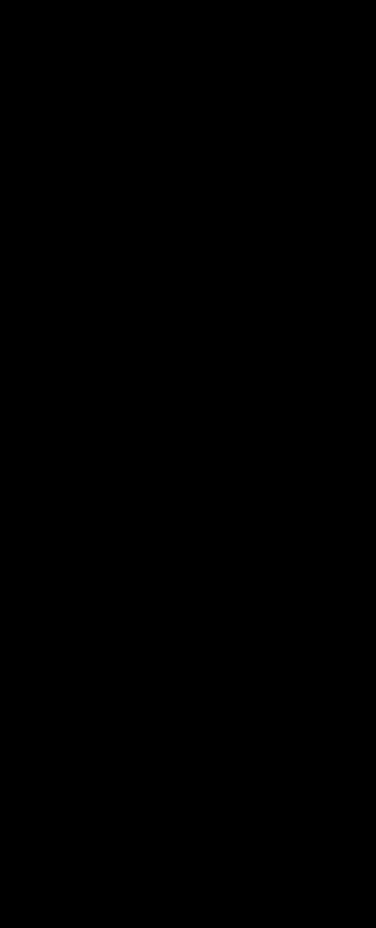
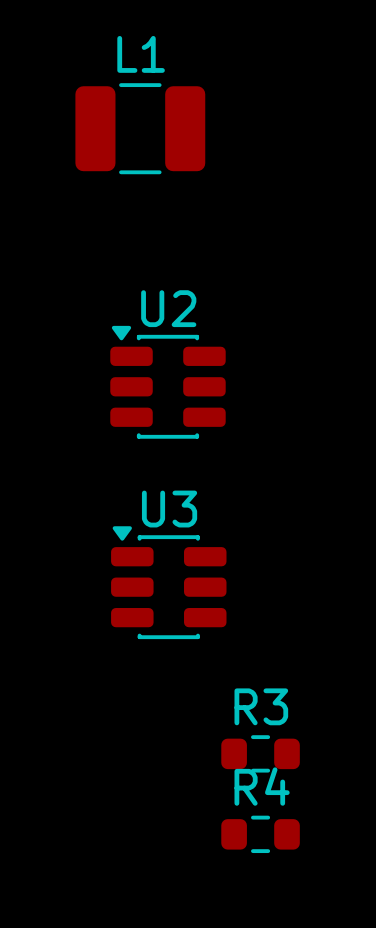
L1: none -> (140, 128)
U2: none -> (167, 382)
U3: none -> (168, 582)
R3: none -> (260, 753)
R4: none -> (260, 834)

